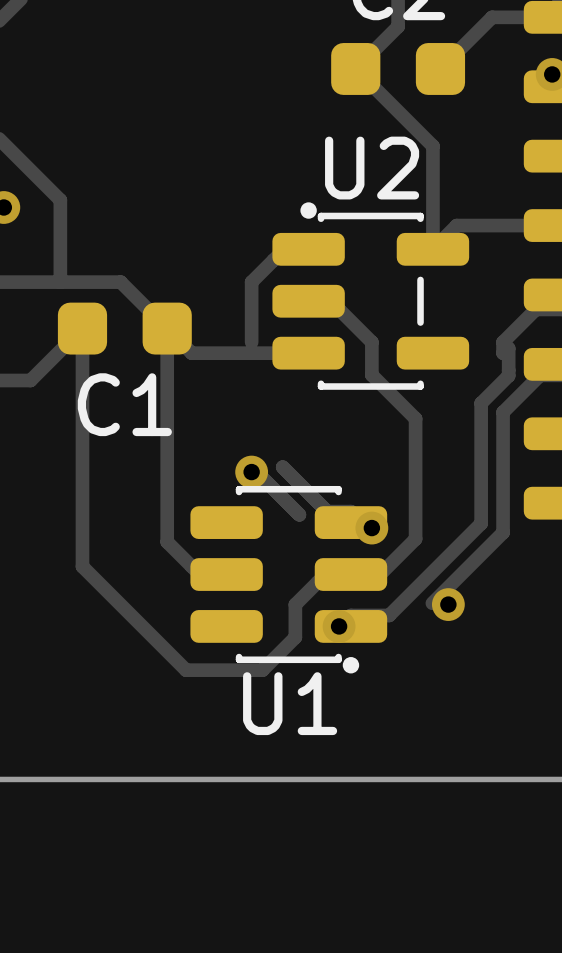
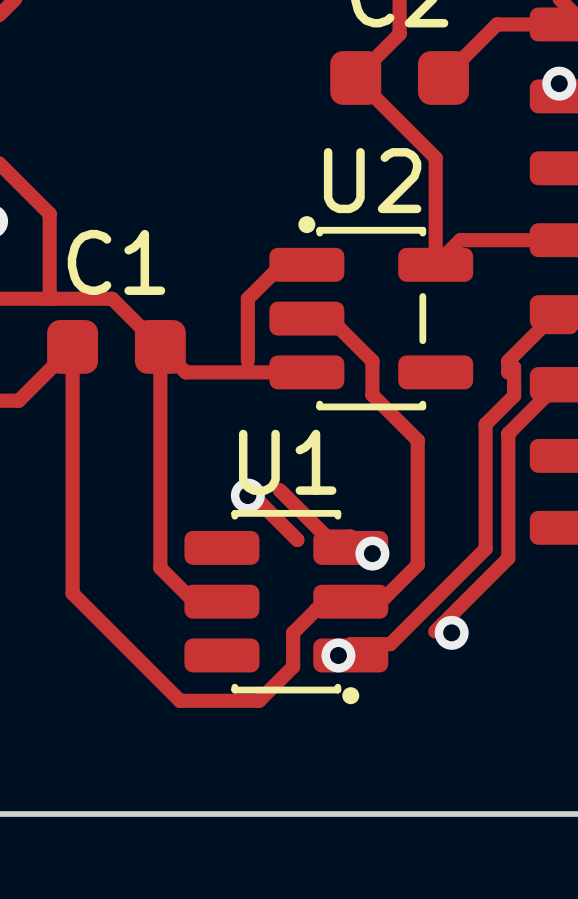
C1 name position: C1 (124, 404) -> C1 (116, 262)
U1 name position: U1 (290, 703) -> U1 (287, 462)

